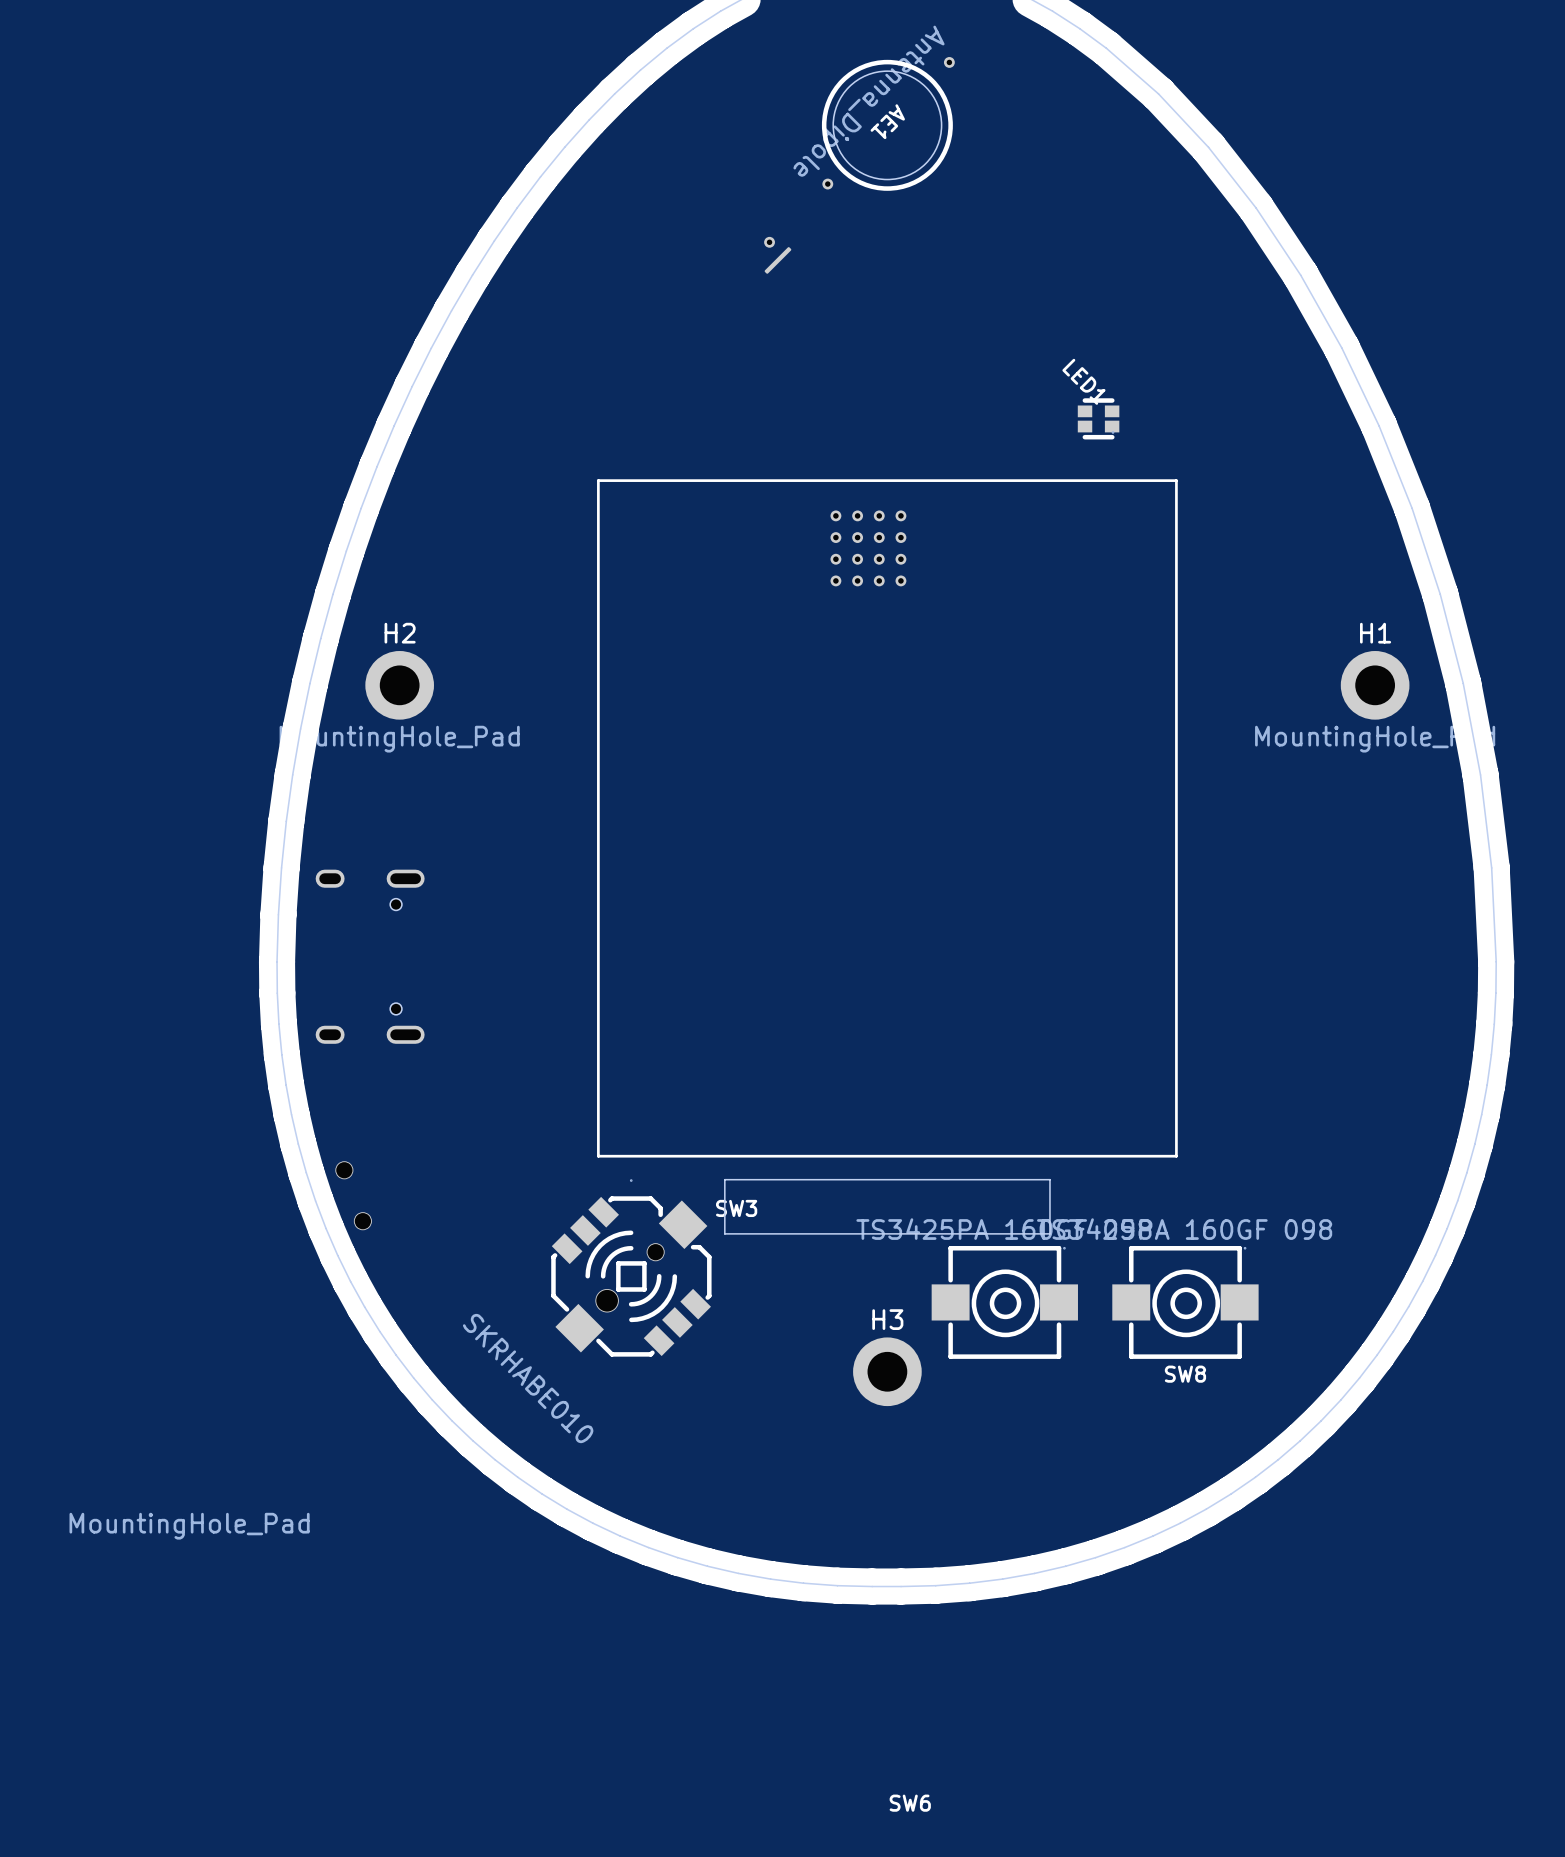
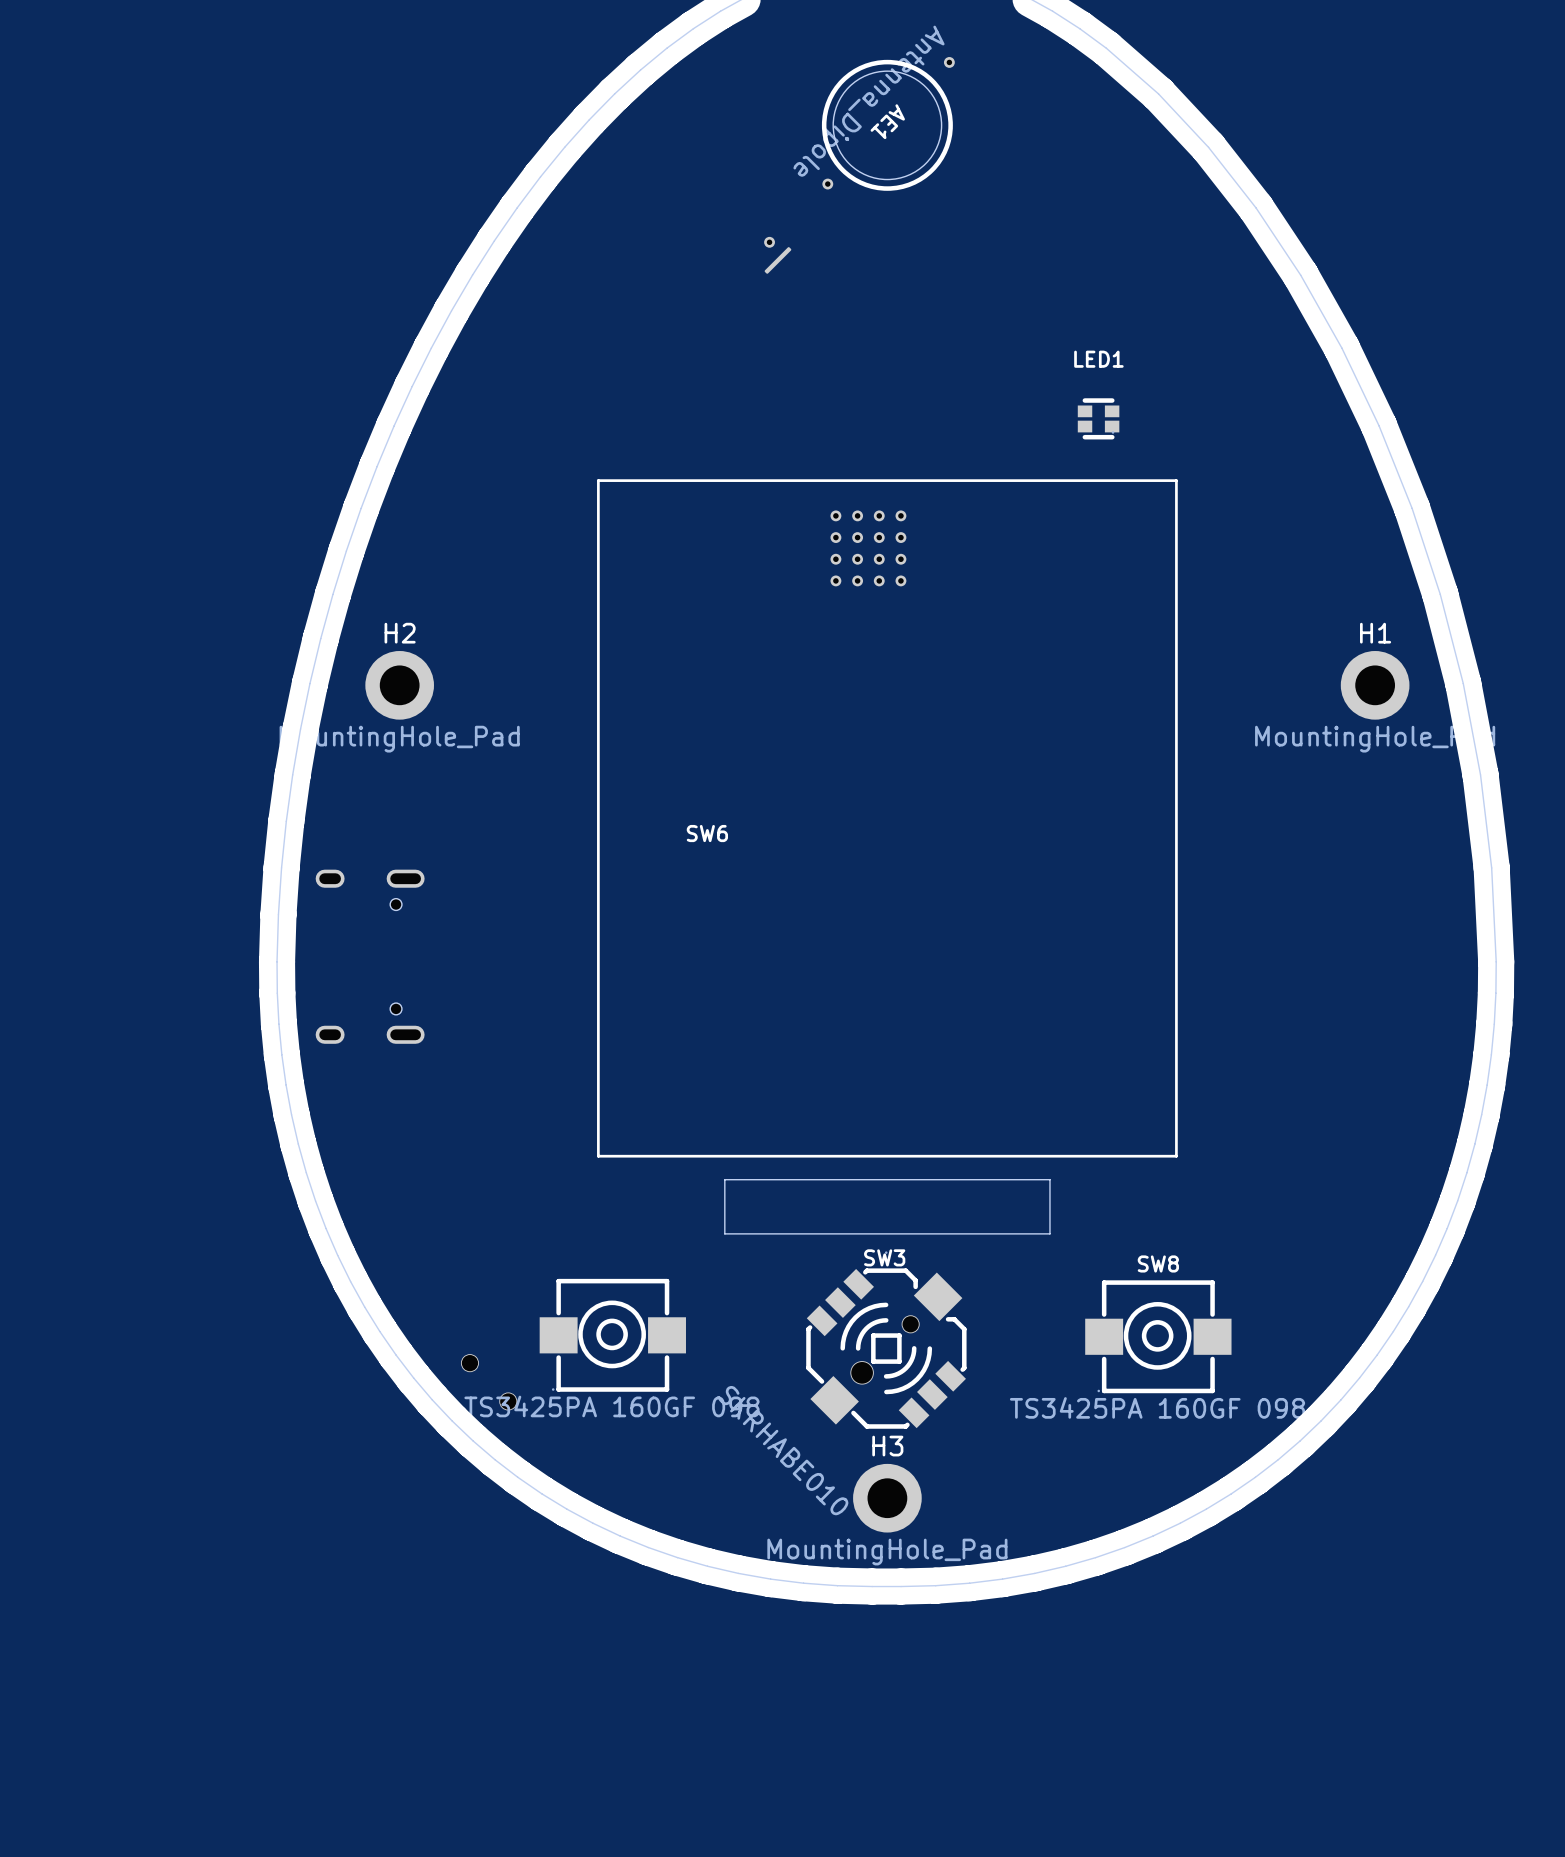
LED1 name rotation: 0° (1083, 381) -> 45° counterclockwise (1098, 359)
part: (353, 1195) -> none
SW3 name position: SW3 (736, 1208) -> SW3 (884, 1257)
SW3 position: (631, 1268) -> (886, 1340)
SW6 rotation: 0° (1004, 1302) -> 180° (612, 1335)
SW6 position: (1004, 1302) -> (612, 1335)
SW8 rotation: 0° (1185, 1302) -> 180° (1158, 1336)
H3 position: (887, 1371) -> (887, 1498)
part: none -> (489, 1382)
H3 value position: MountingHole_Pad (189, 1526) -> MountingHole_Pad (887, 1552)

